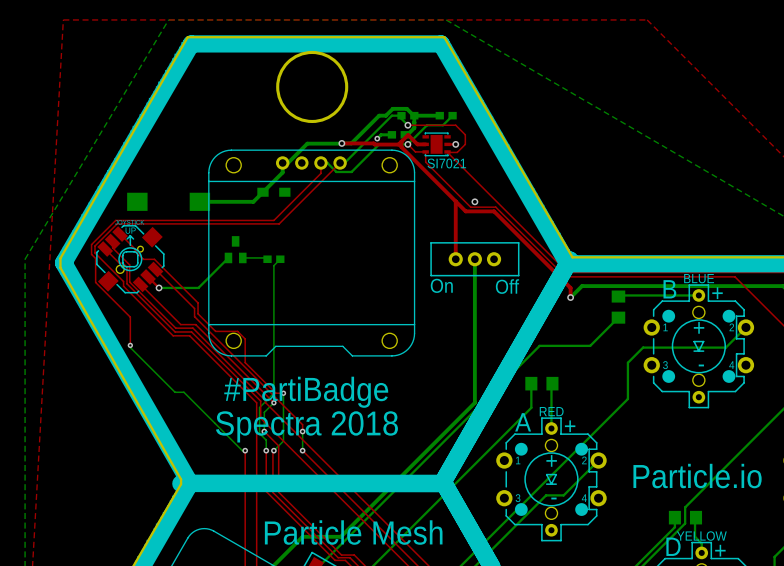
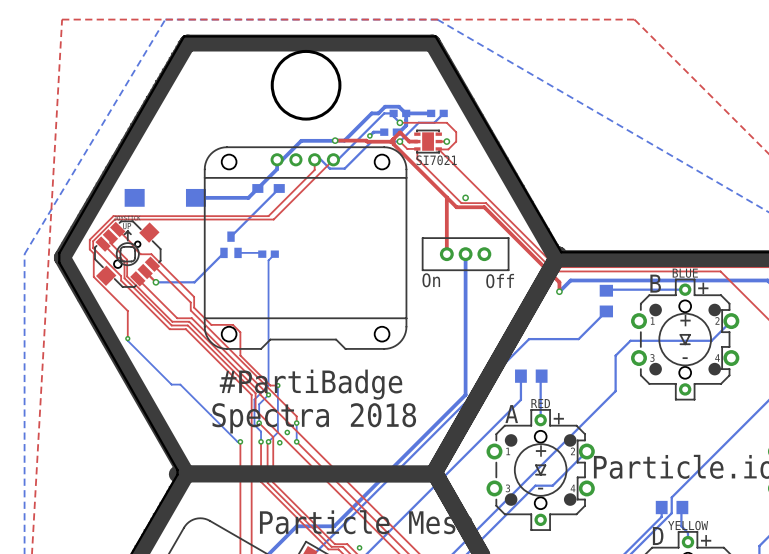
bottom track: none -> (279, 188) (231, 236)
via: none -> (287, 432)
via: none -> (279, 442)
via: none -> (359, 547)

